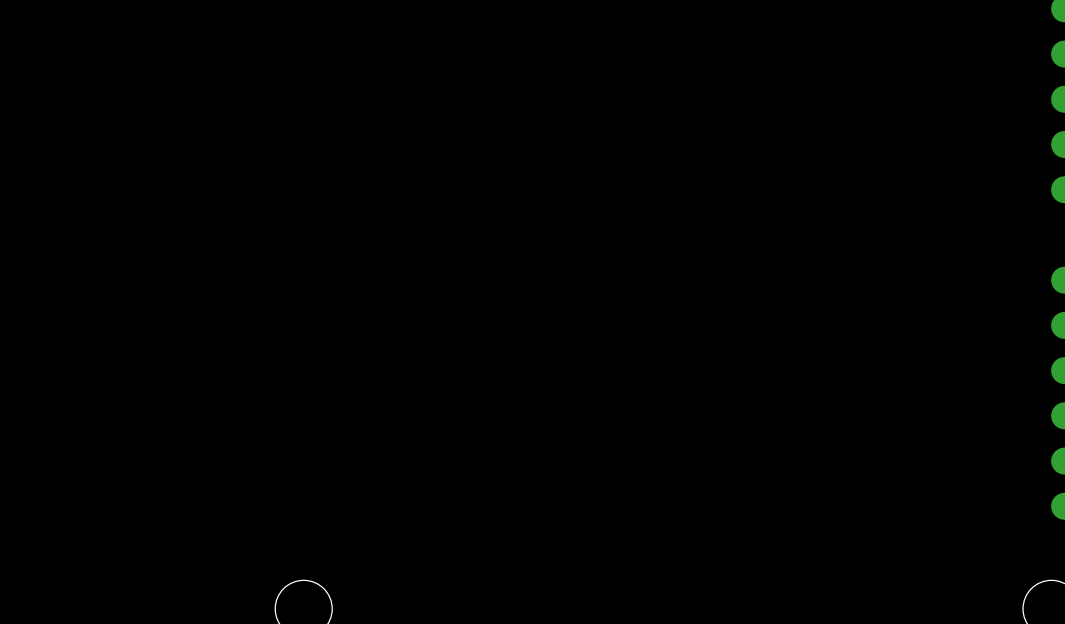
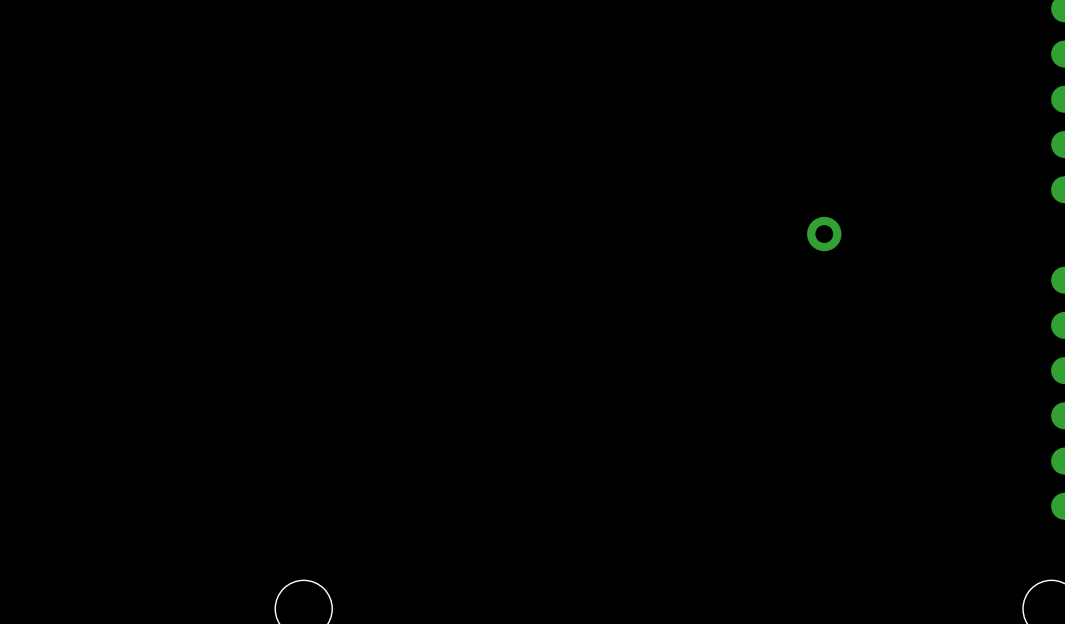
part: none -> (824, 234)

